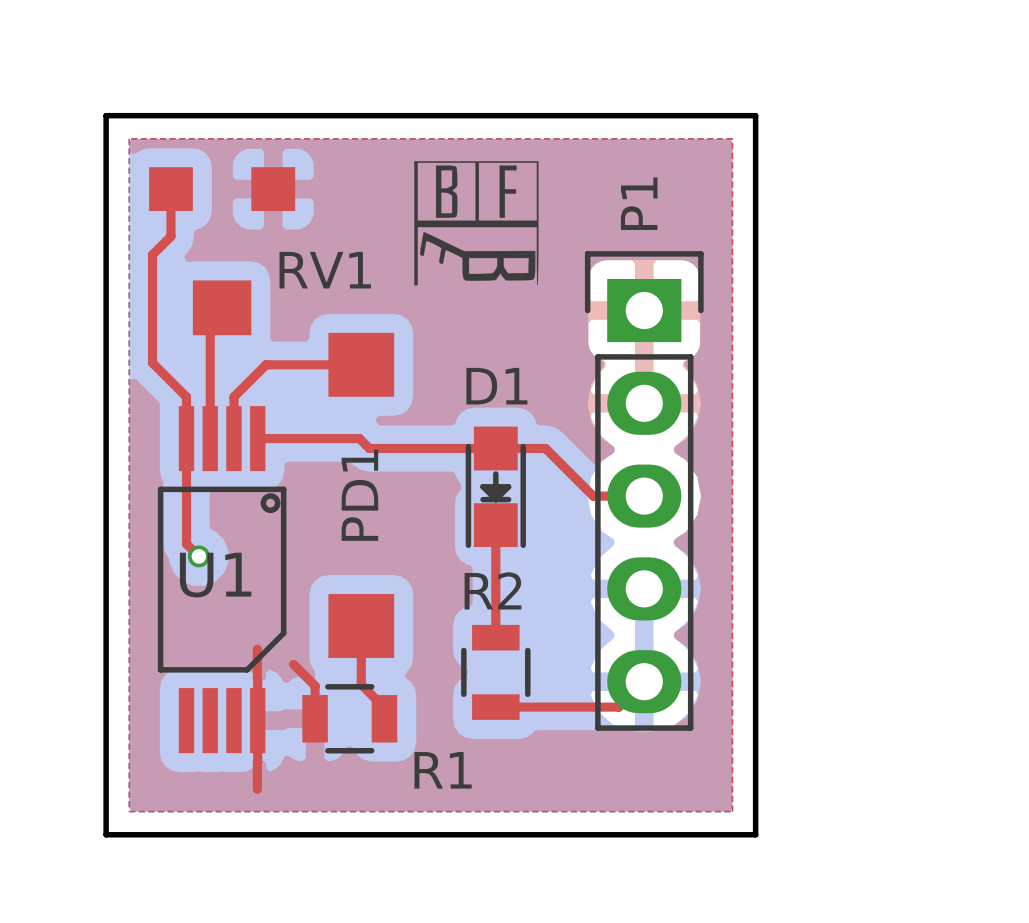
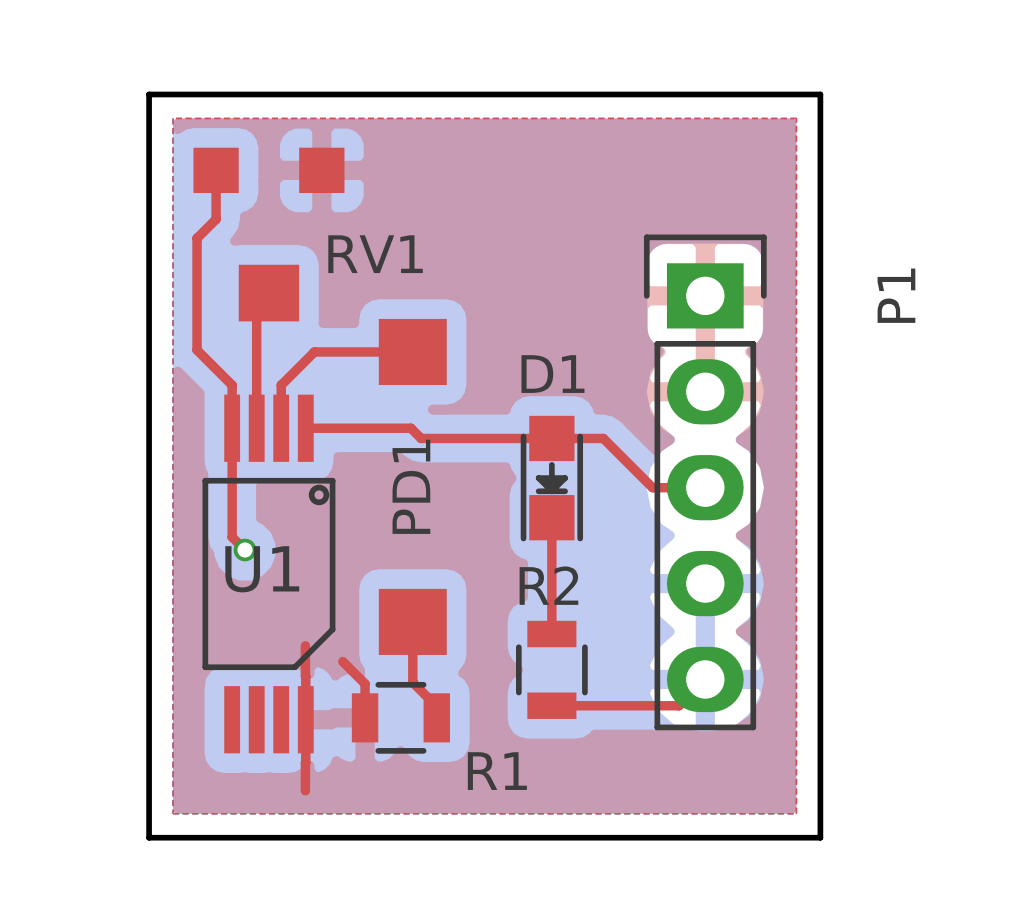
drawing: [414, 161, 539, 286] -> none
P1 name position: P1 (639, 203) -> P1 (896, 295)

